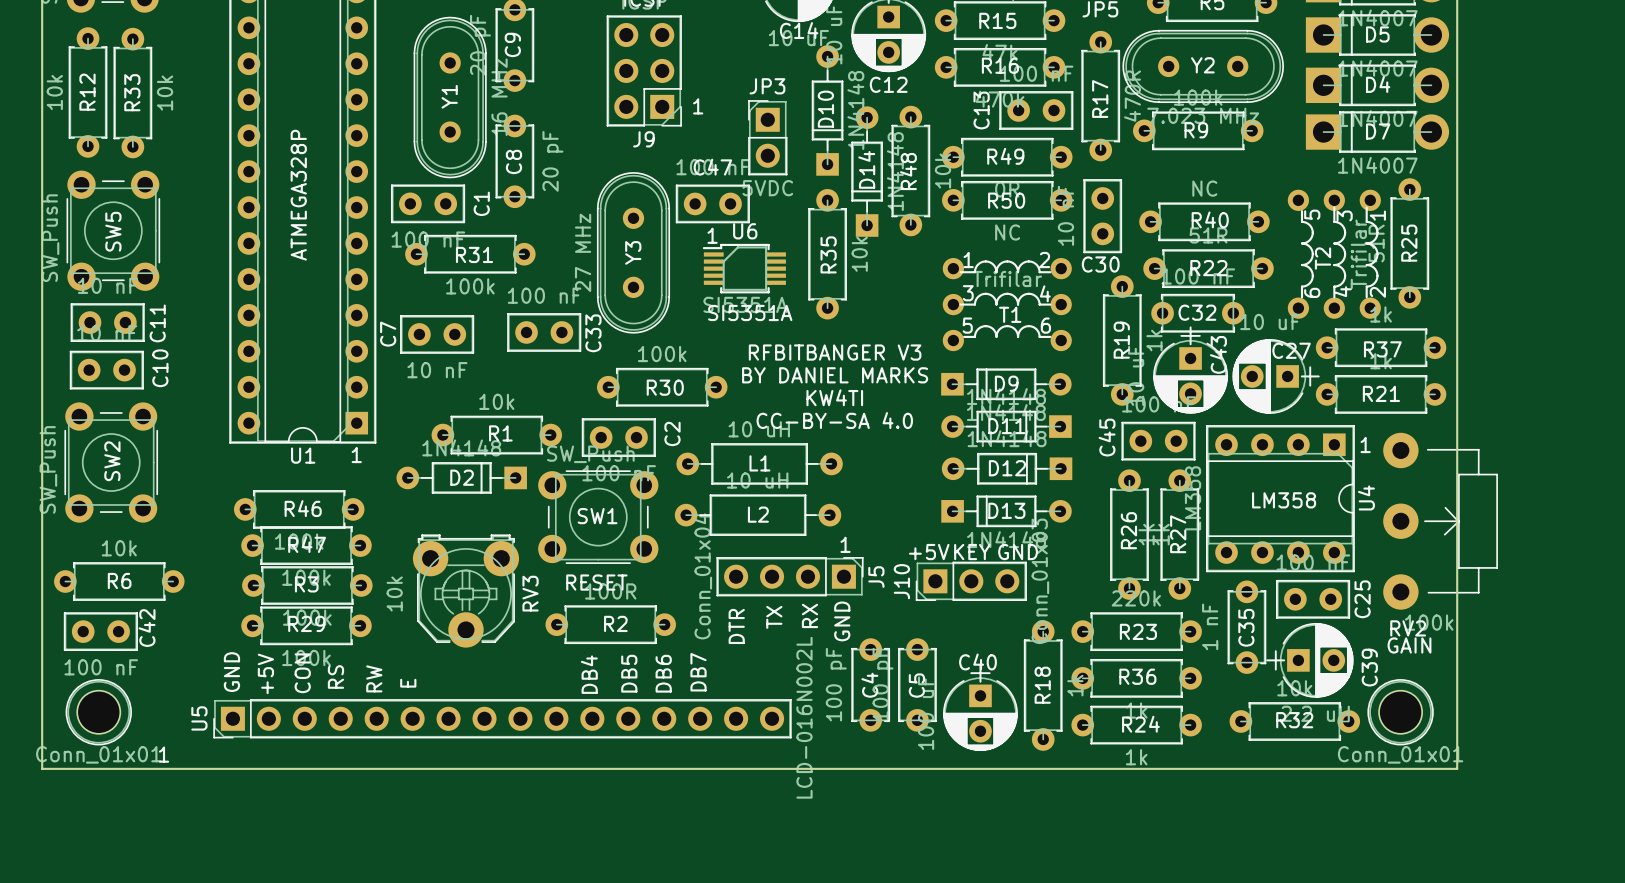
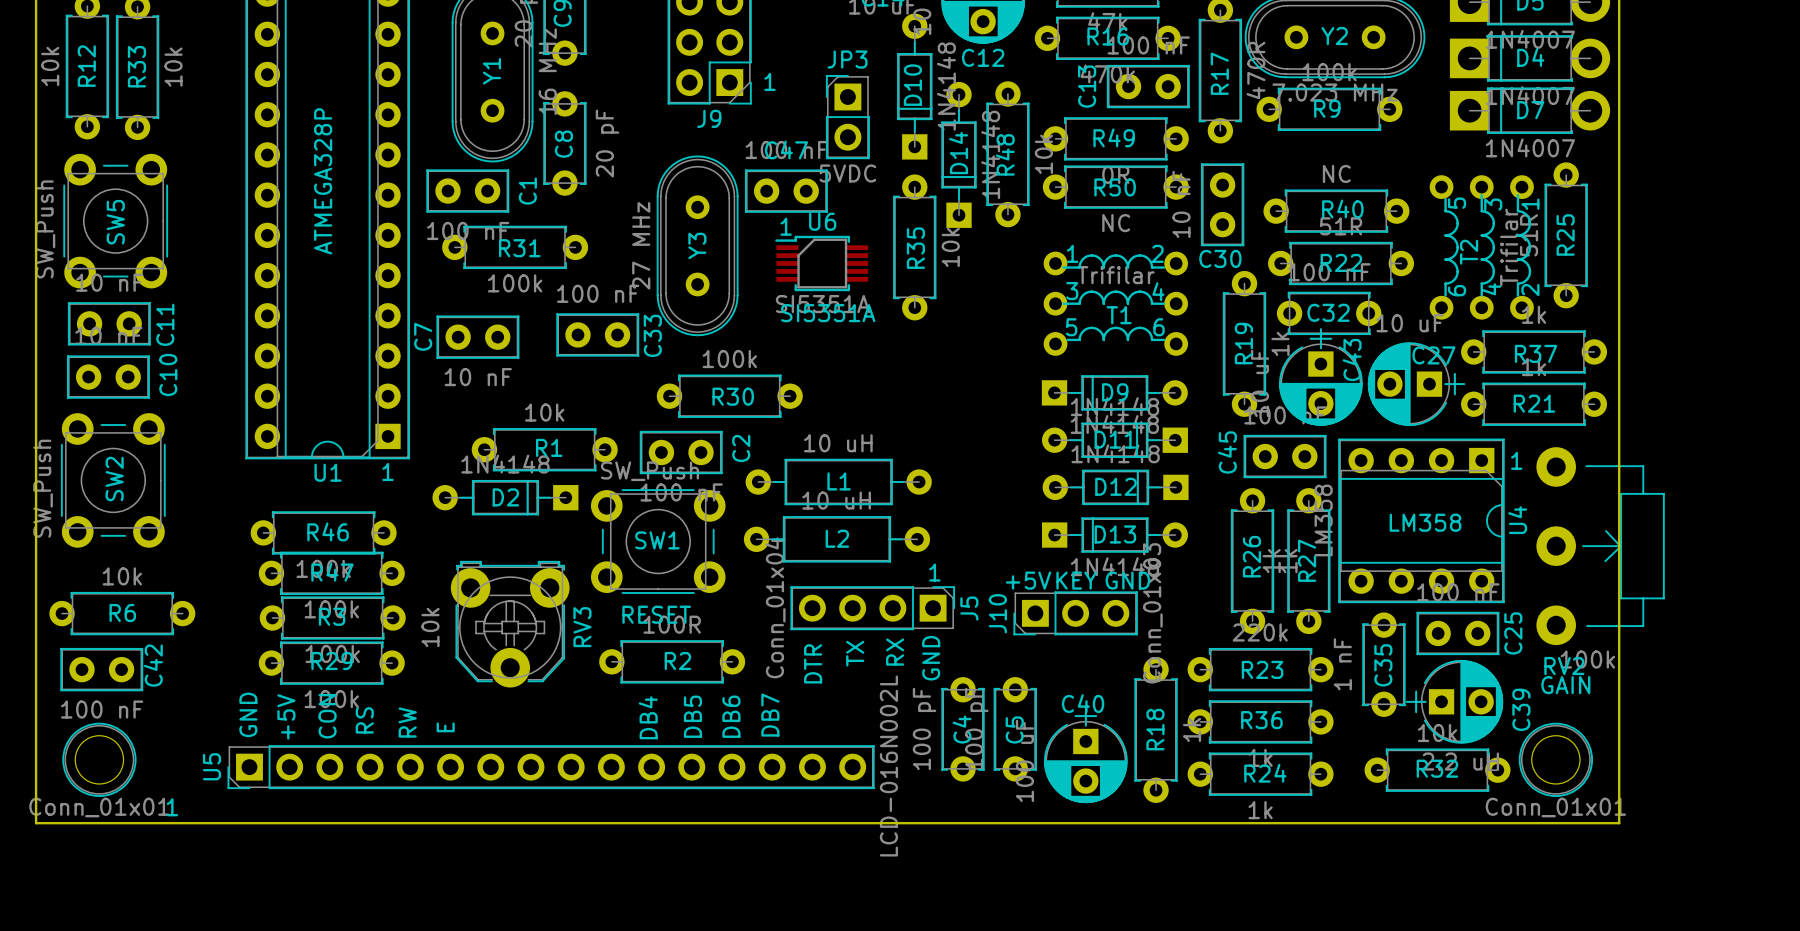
text: RFBITBANGER V3 (835, 352) -> none
text: BY DANIEL MARKS (835, 375) -> none
text: KW4TI (834, 397) -> none
text: CC-BY-SA 4.0 (834, 420) -> none

